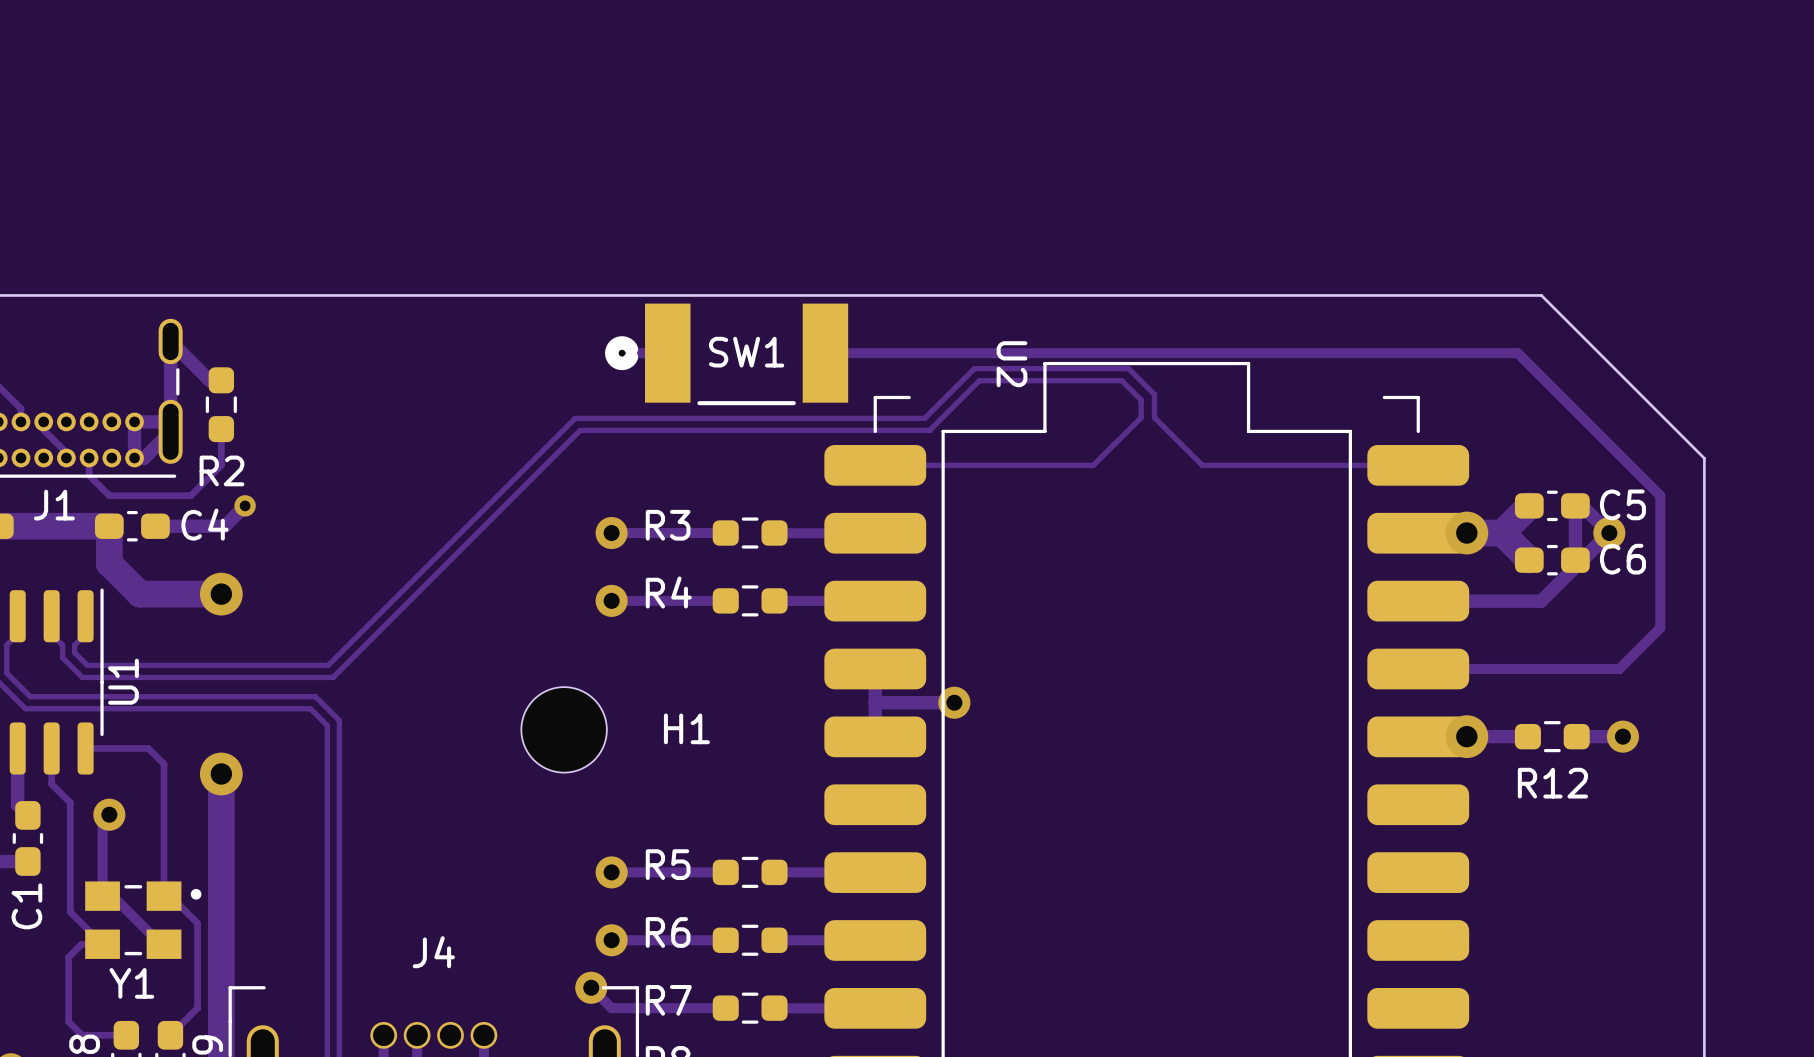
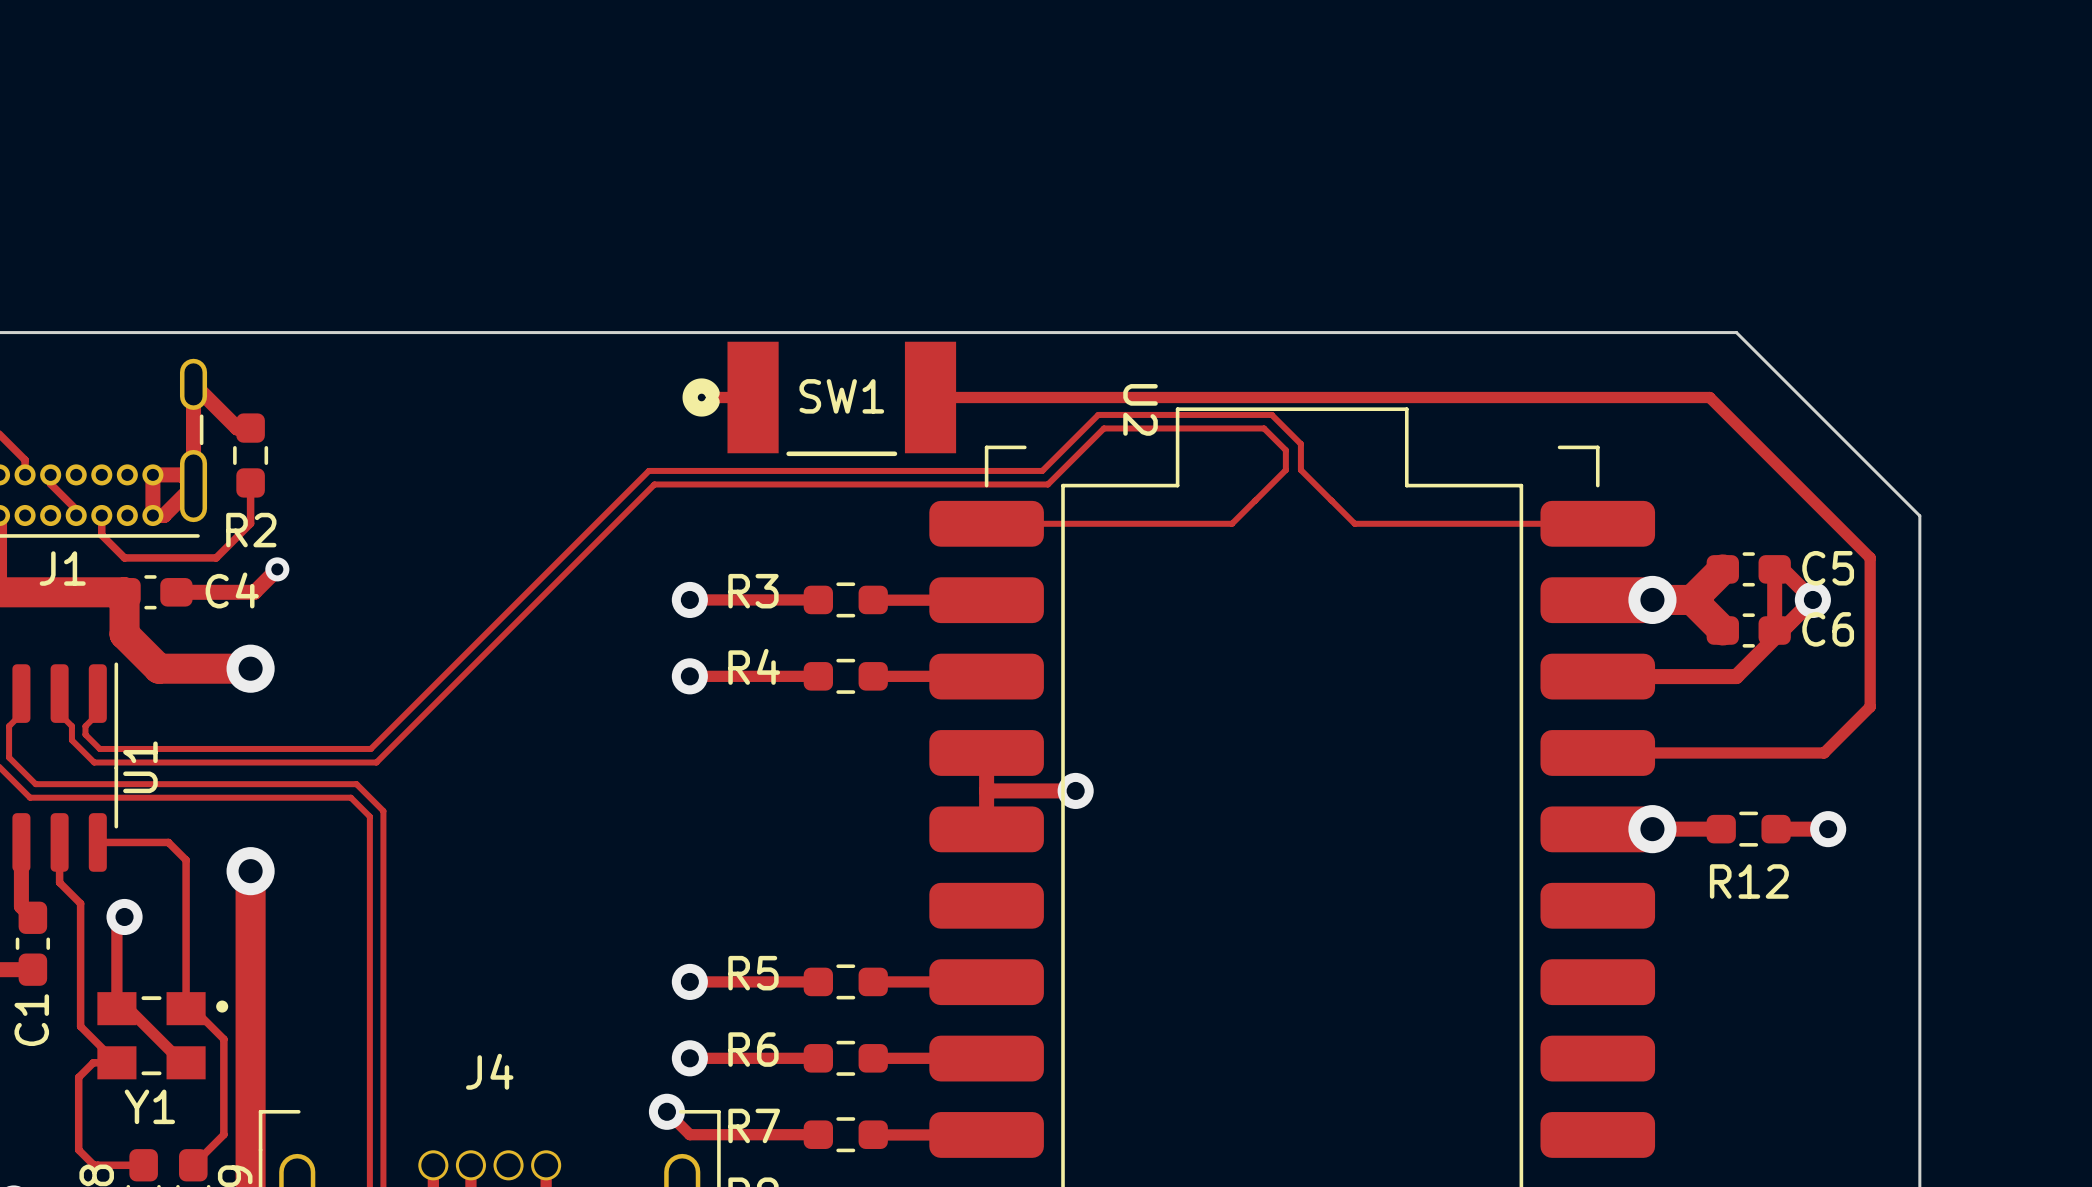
H1: (564, 729) -> none

